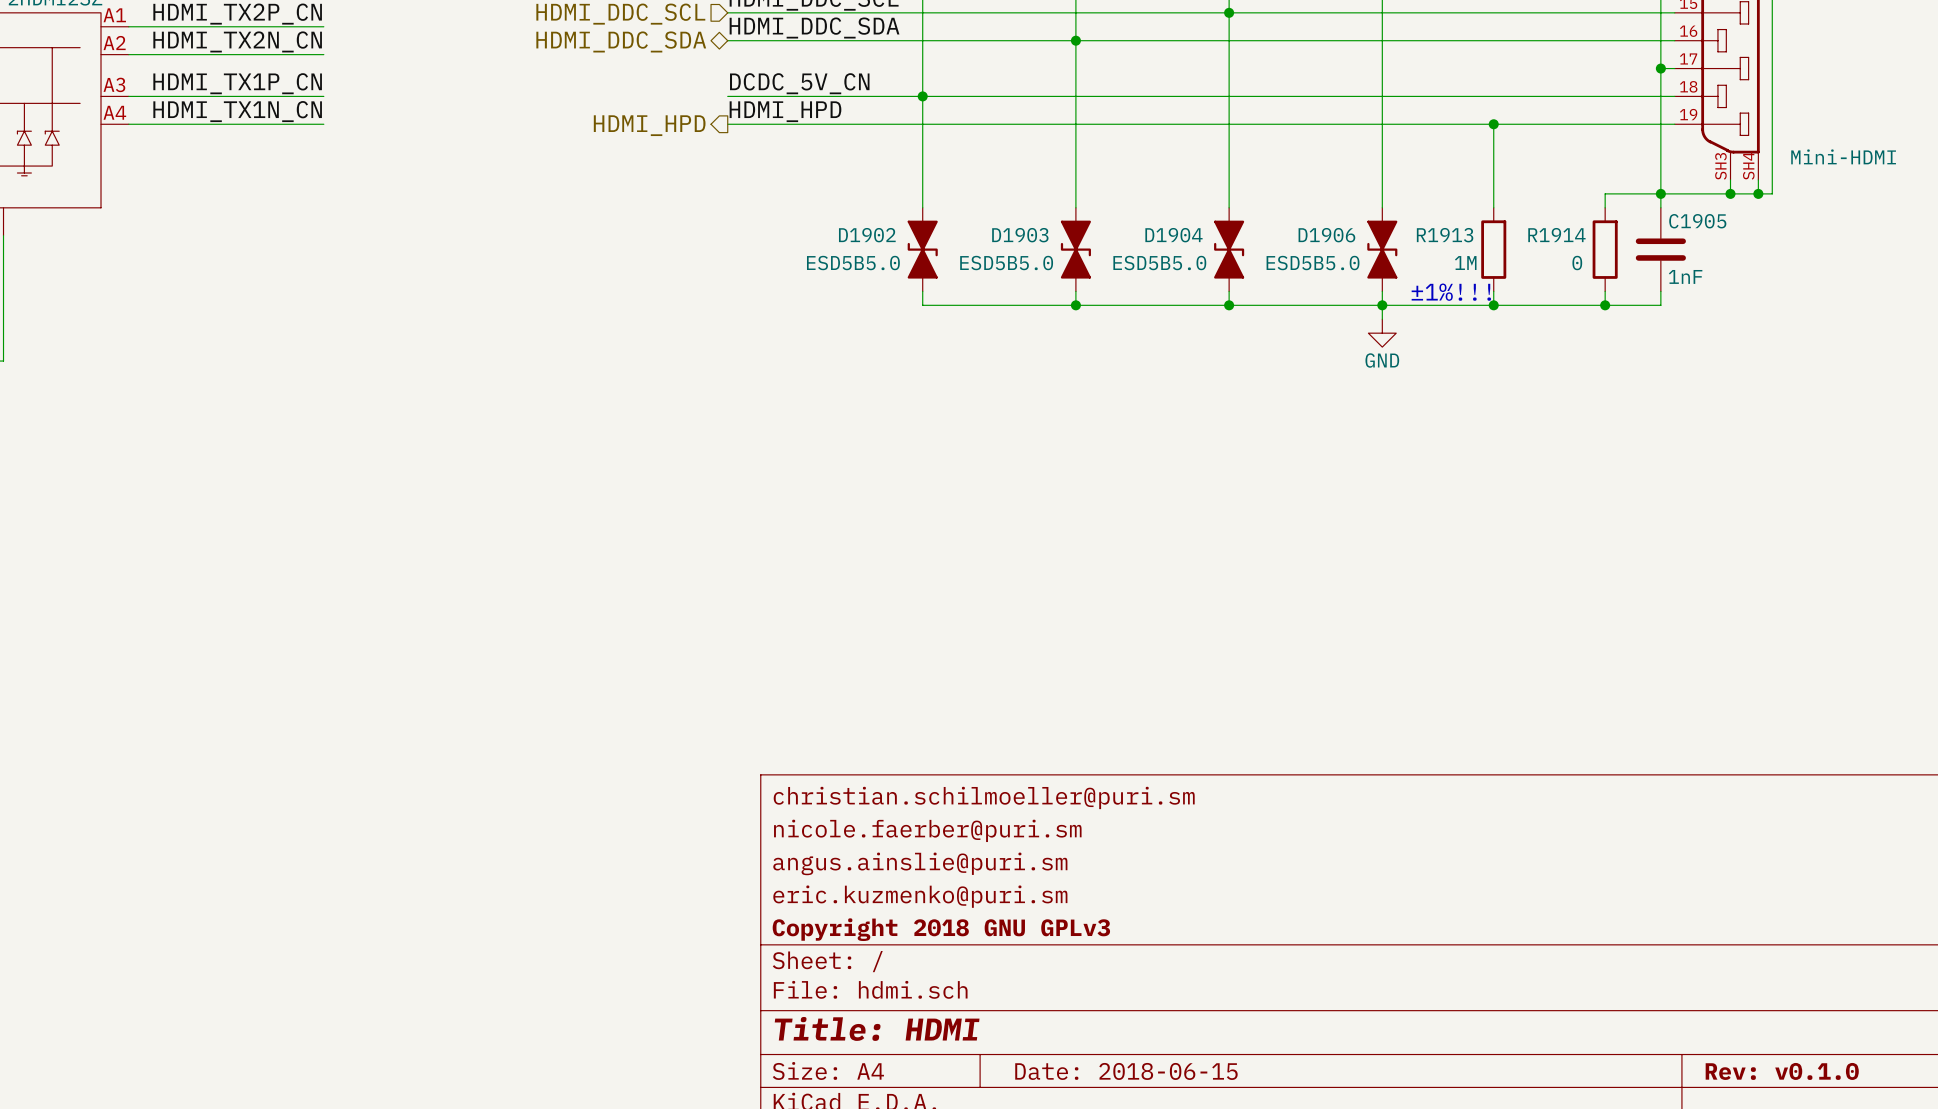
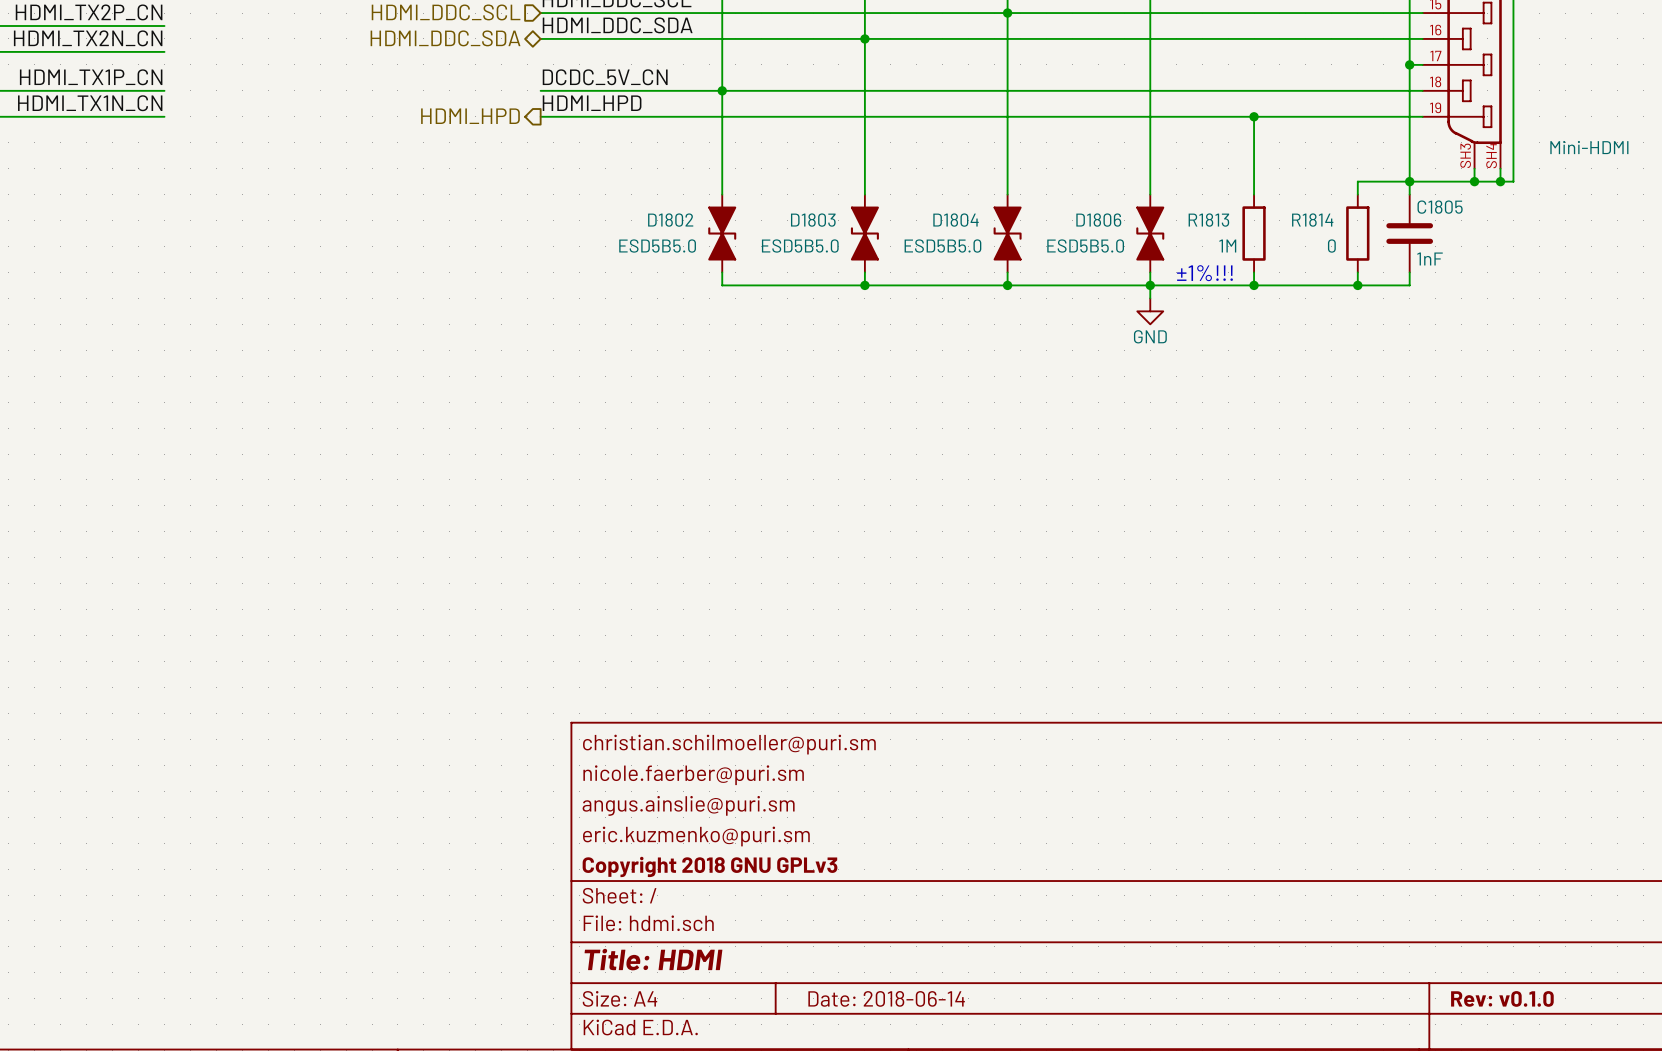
C1905 name: C1905 (1697, 221) -> C1805 (1440, 207)
D1902 name: D1902 (867, 235) -> D1802 (670, 220)
D1903 name: D1903 (1020, 235) -> D1803 (813, 220)
D1904 name: D1904 (1173, 235) -> D1804 (956, 220)
D1906 name: D1906 (1326, 235) -> D1806 (1098, 220)
R1913 name: R1913 (1445, 235) -> R1813 (1208, 220)
R1914 name: R1914 (1556, 235) -> R1814 (1312, 220)
title block: Date: 2018-06-15 (1126, 1071) -> Date: 2018-06-14 (886, 998)

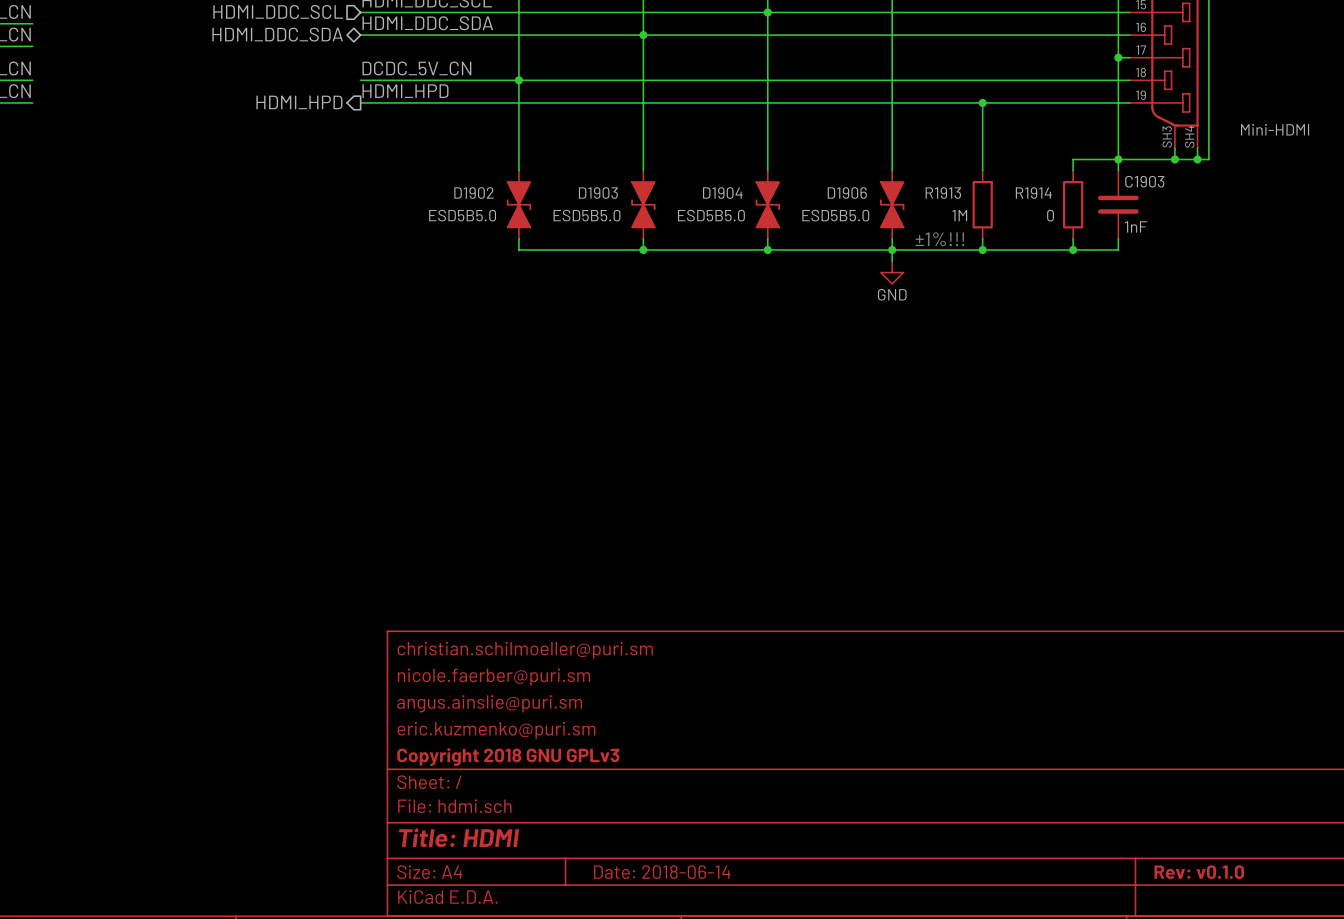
C1805 name: C1805 (1440, 207) -> C1903 (1144, 181)
D1802 name: D1802 (670, 220) -> D1902 (474, 193)
D1803 name: D1803 (813, 220) -> D1903 (598, 193)
D1804 name: D1804 (956, 220) -> D1904 (722, 193)
D1806 name: D1806 (1098, 220) -> D1906 (847, 193)
R1813 name: R1813 (1208, 220) -> R1913 (943, 193)
R1814 name: R1814 (1312, 220) -> R1914 (1033, 193)

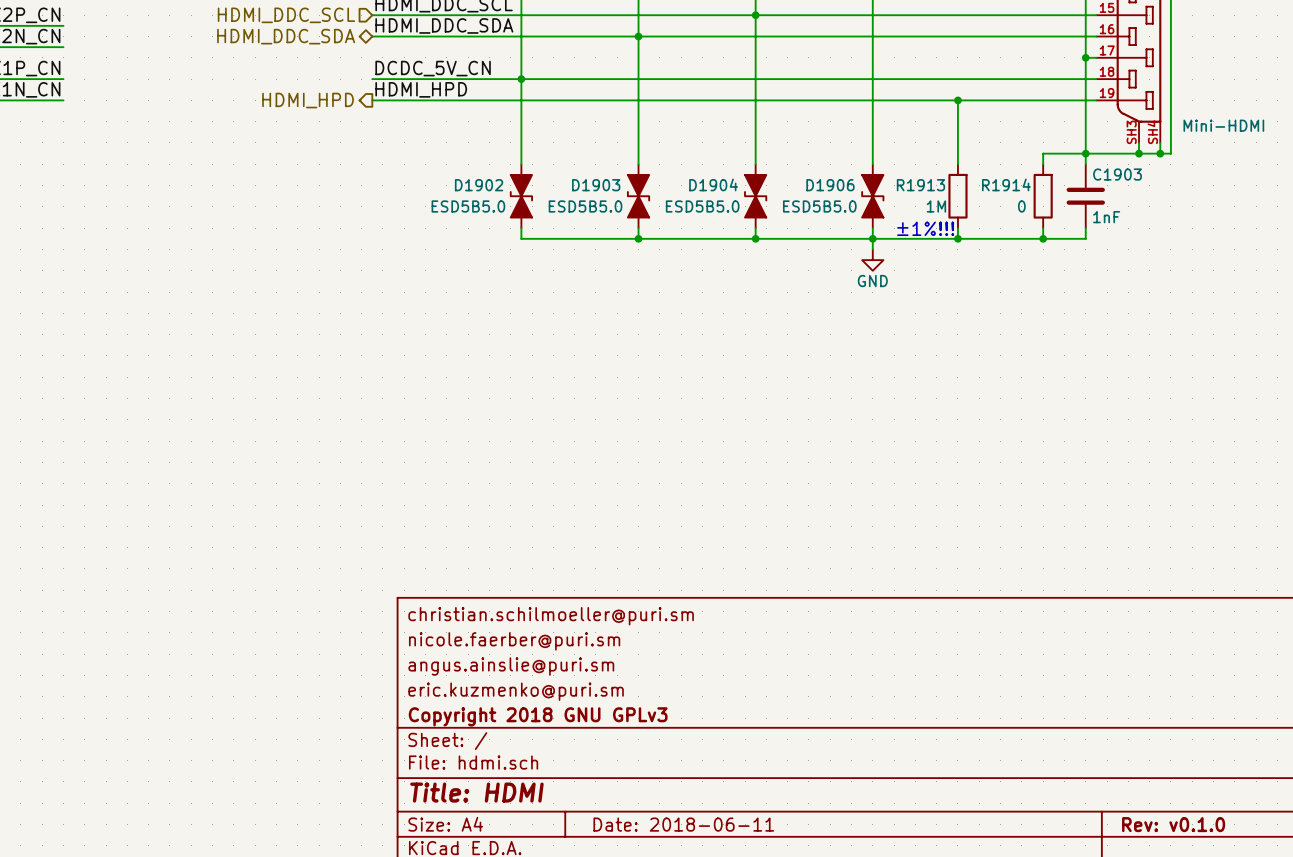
title block: Date: 2018-06-14 (662, 872) -> Date: 2018-06-11 (683, 824)

